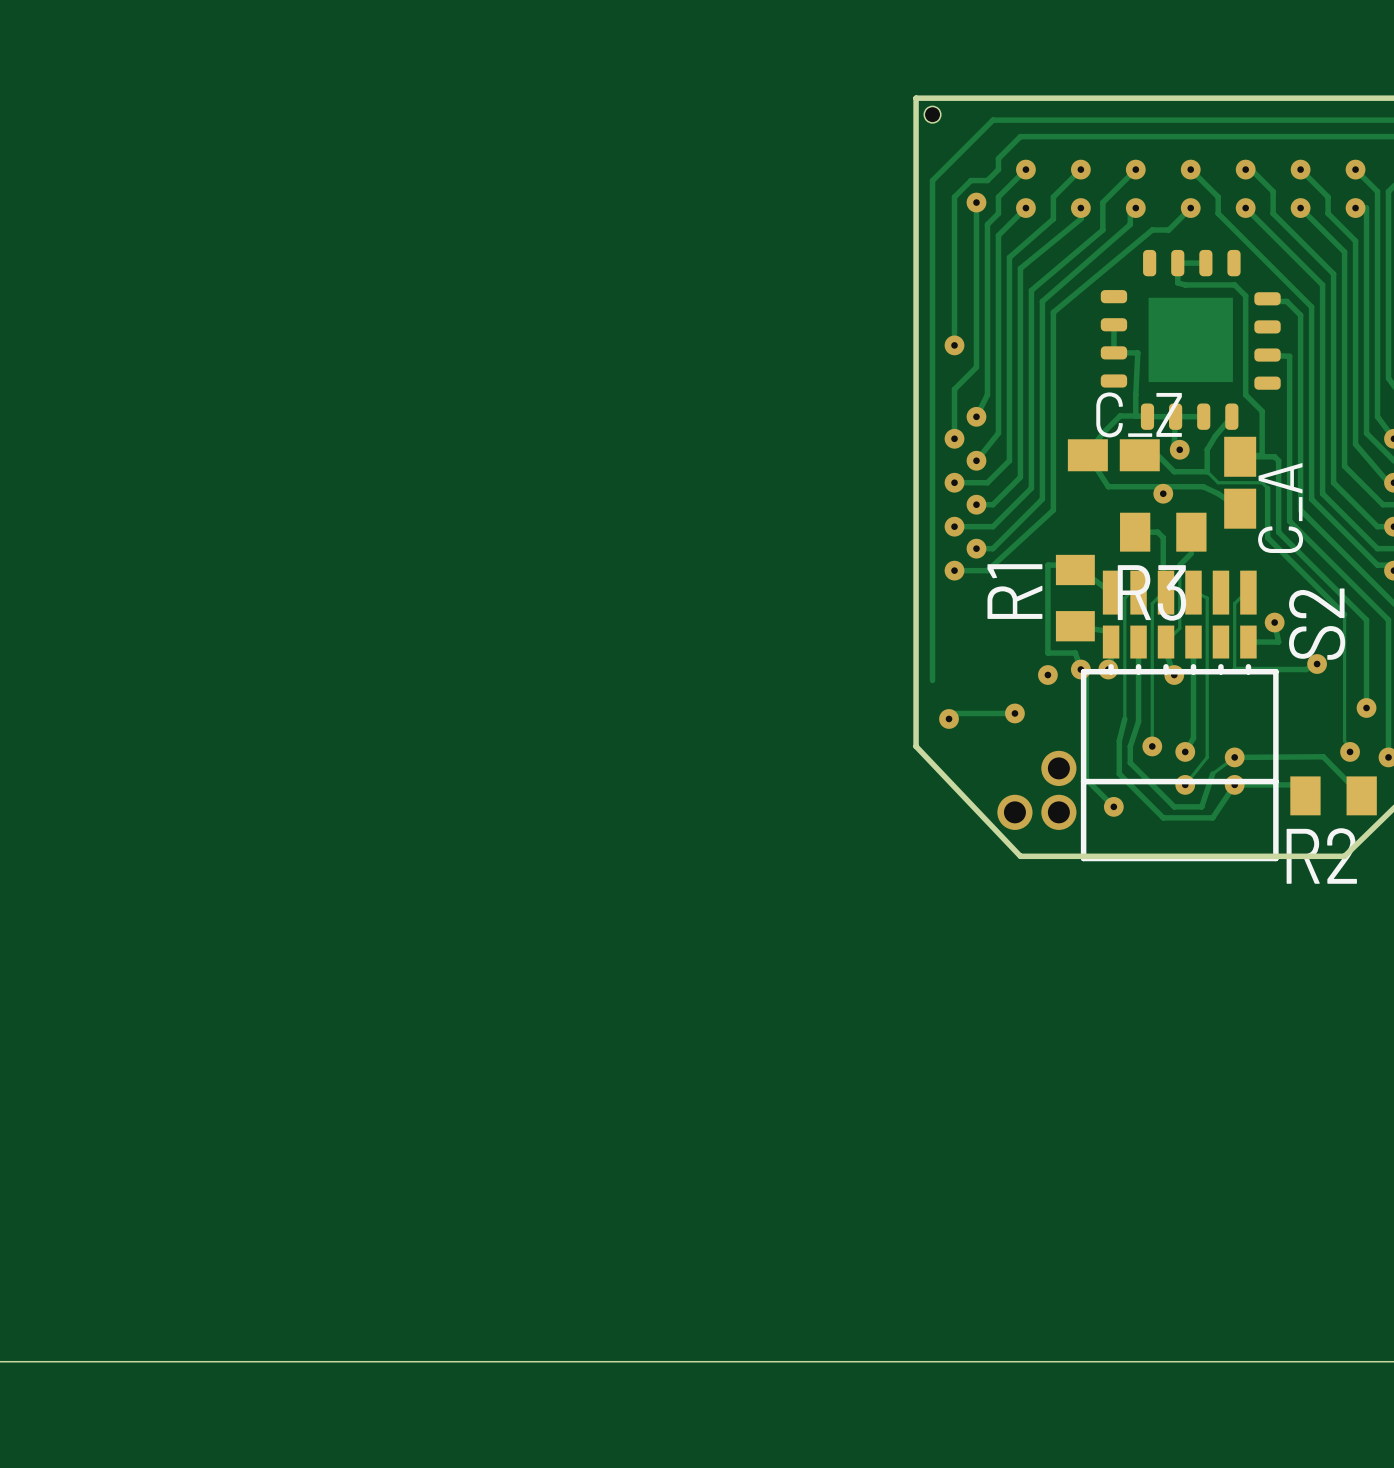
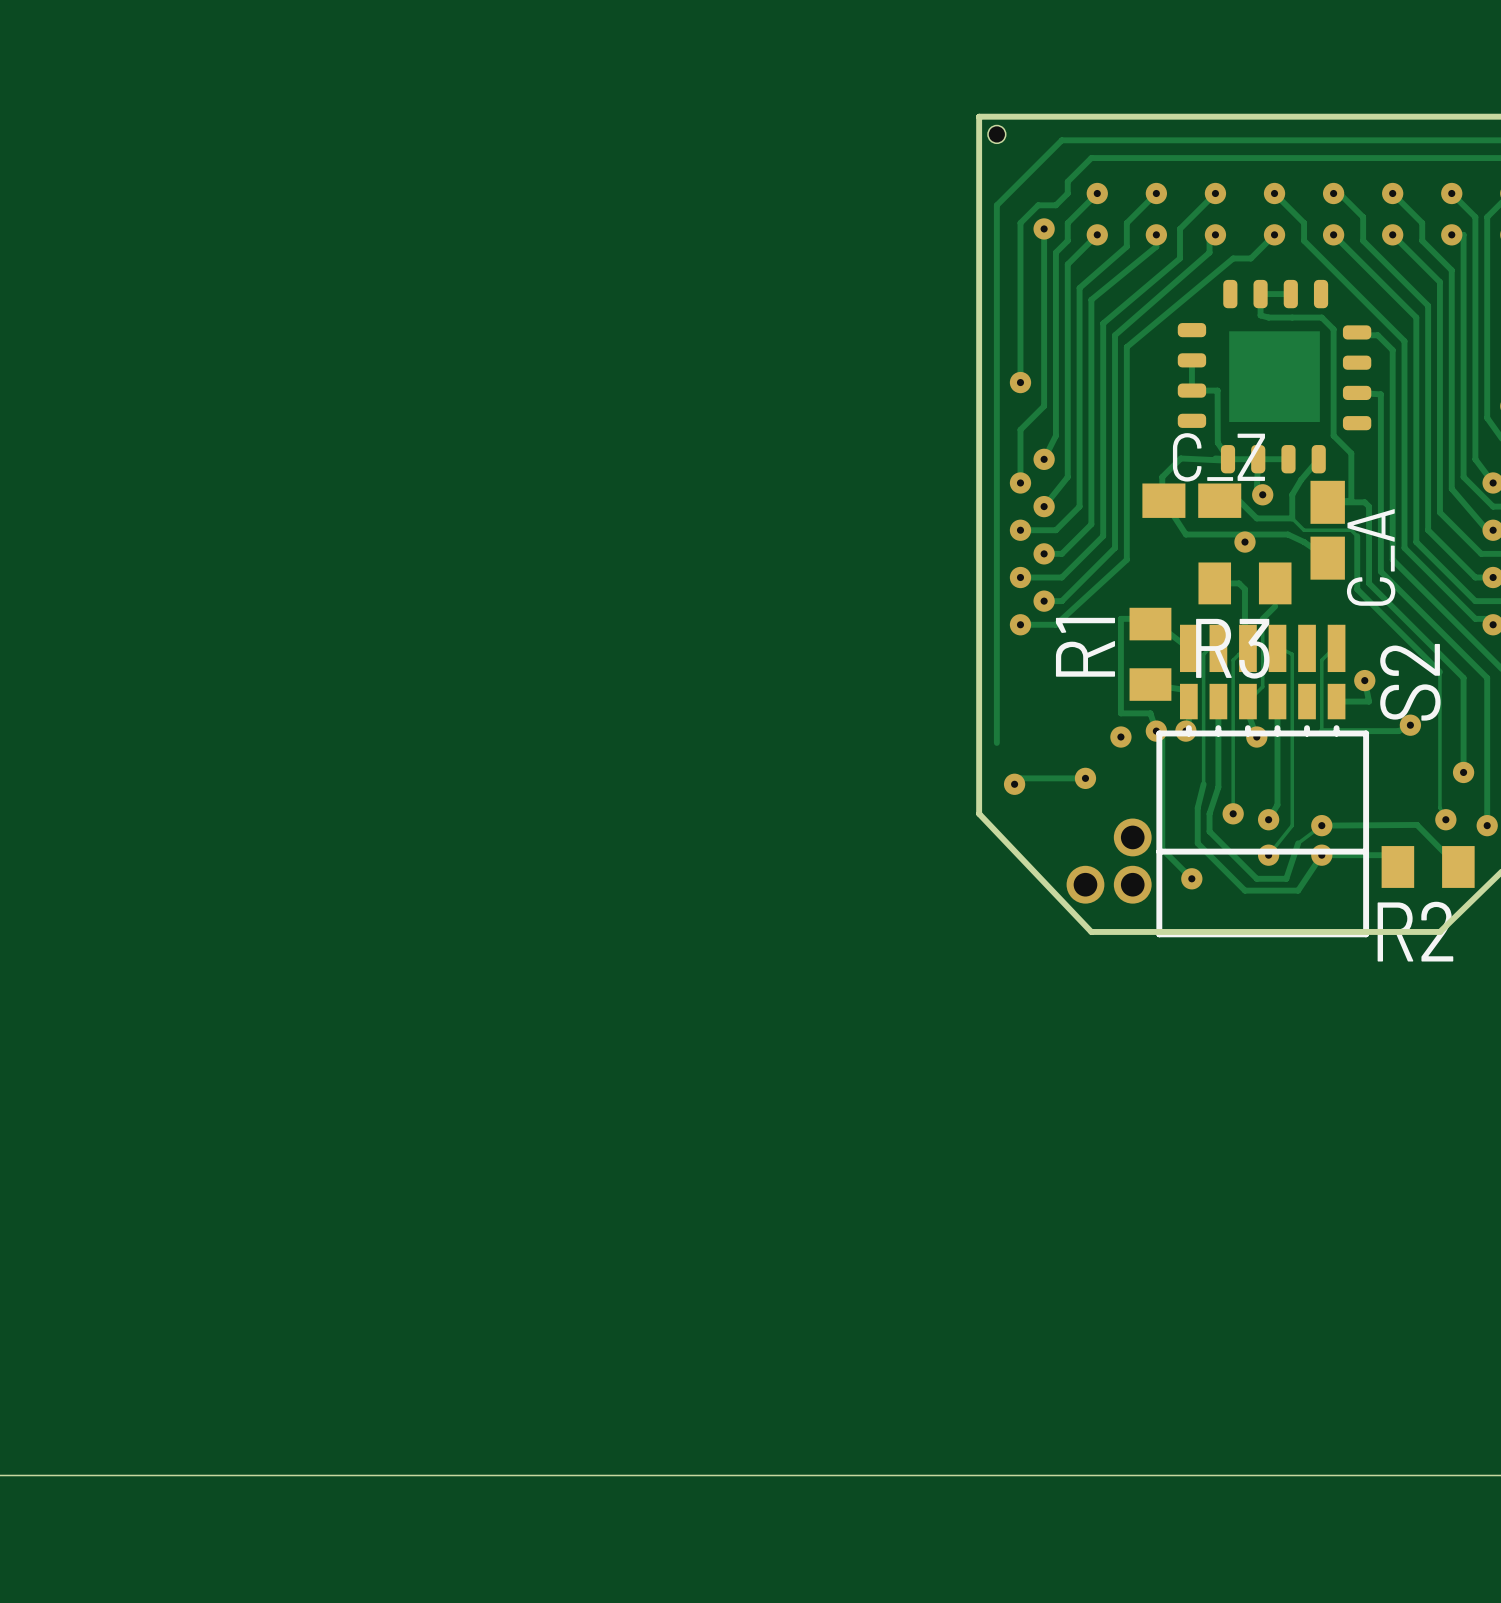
track: (1137, 352) (1135, 415) (1120, 415) (1102, 433) (1086, 455) -> (1217, 390) (1217, 442) (1229, 460) (1180, 458) (1162, 477) (1162, 500)

